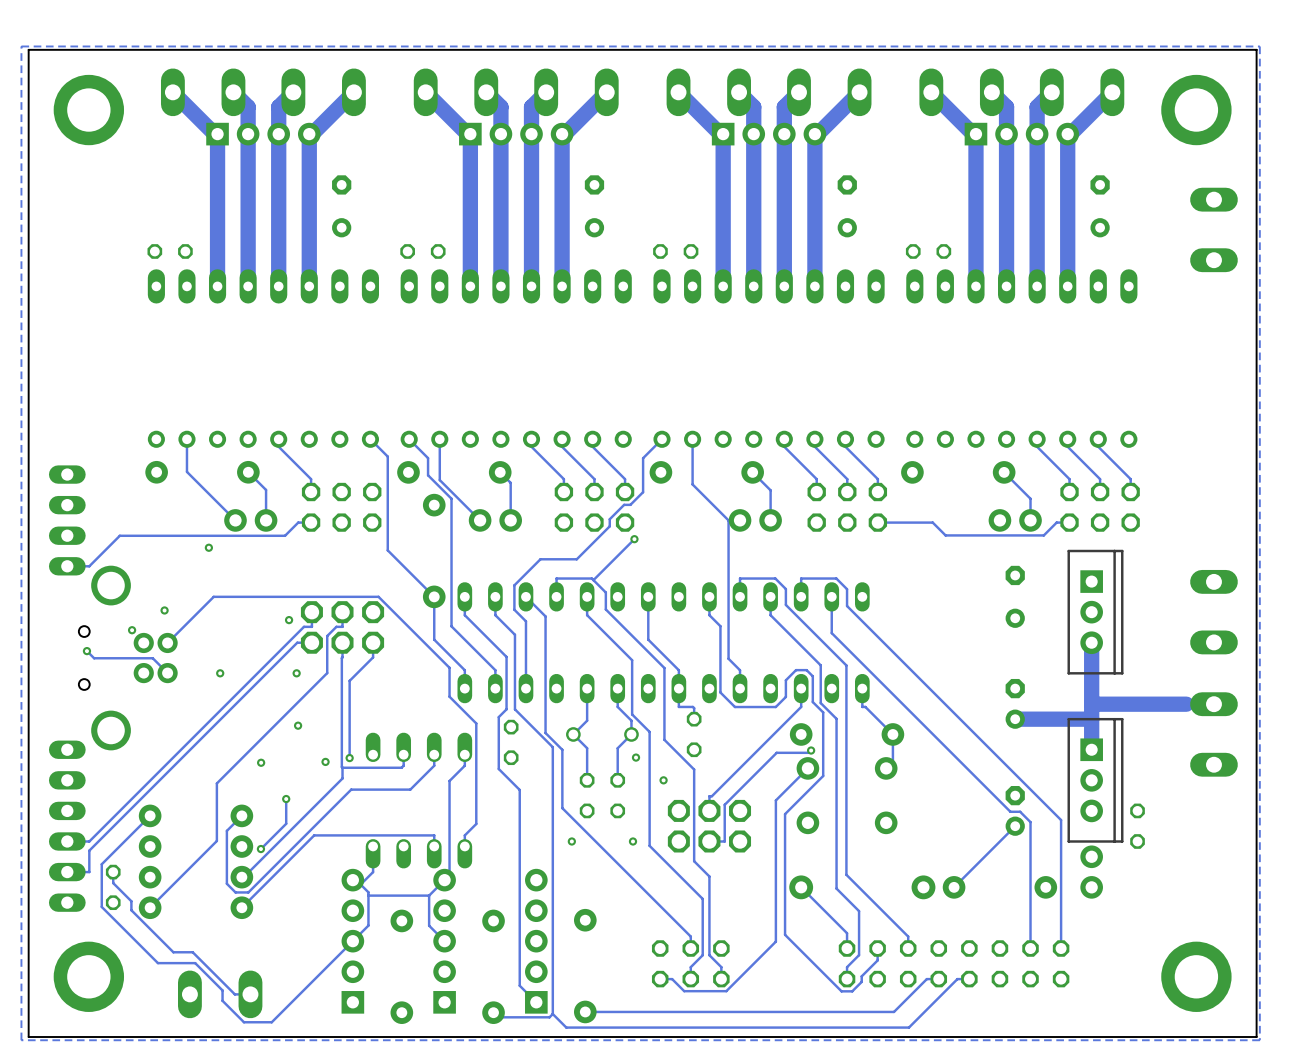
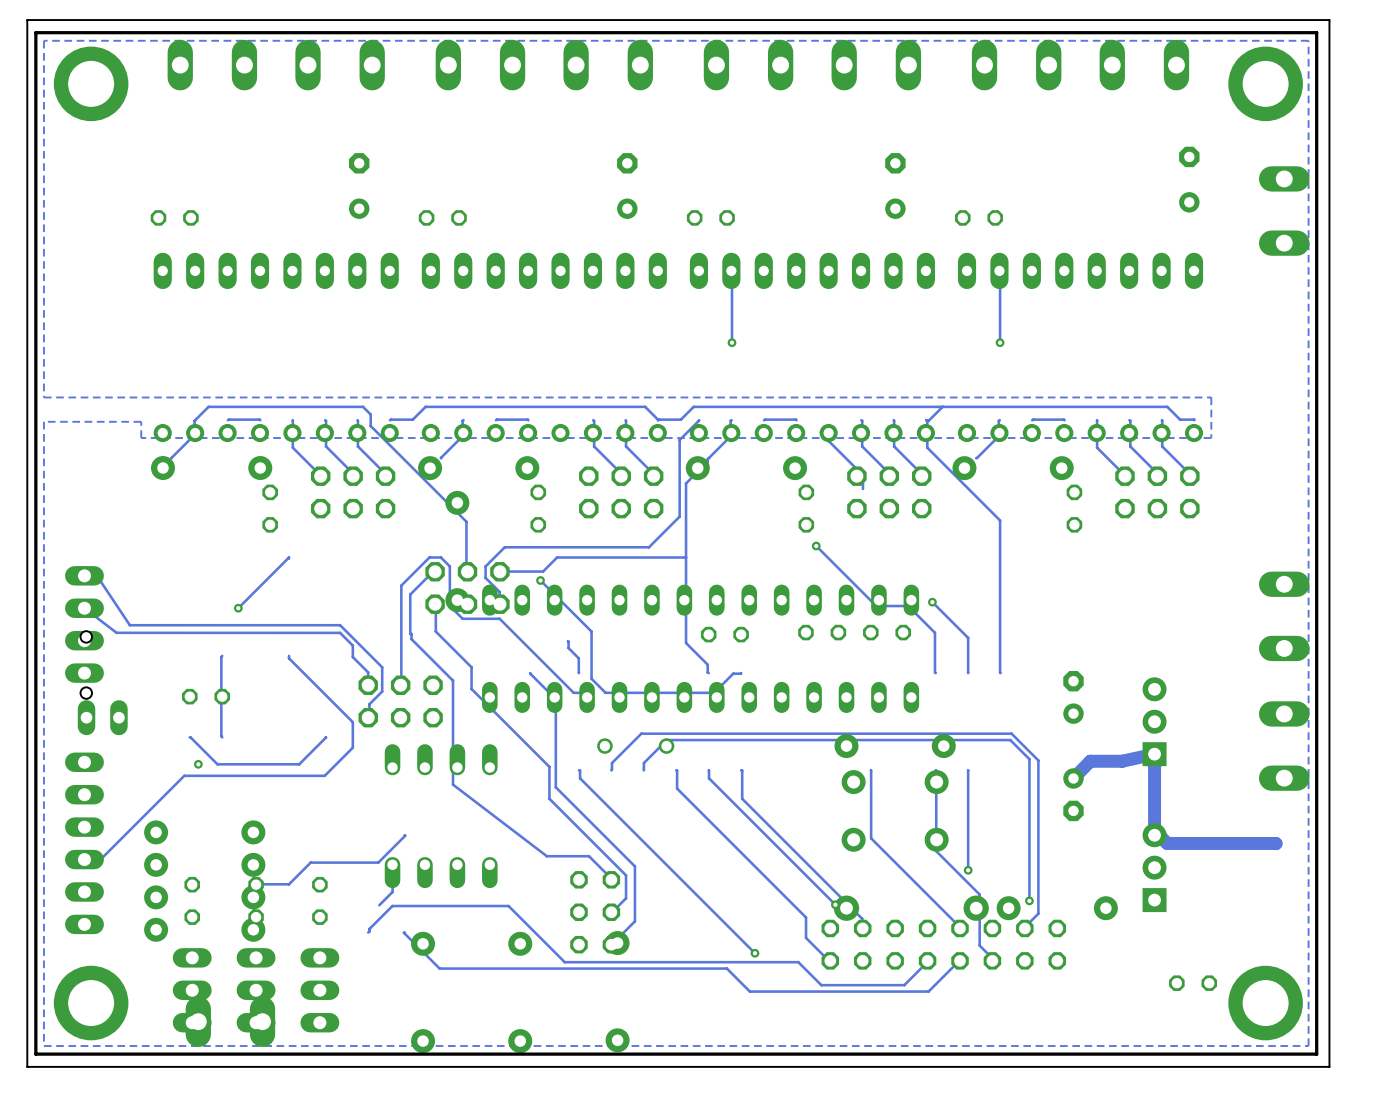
zone outline: (1259, 46) (21, 46) (21, 1040) (1259, 1040) (1259, 46) -> (1308, 40) (1308, 1046) (43, 1046) (43, 421) (141, 421) (141, 438) (1211, 438) (1211, 397) (43, 397) (43, 40) (1308, 40)
board edge: none -> (1316, 32) (1316, 1054) (35, 1054) (35, 32) (1316, 32)
track: (172, 92) (217, 136) -> none
track: (233, 92) (248, 107) (248, 286) -> none
track: (293, 92) (278, 107) (278, 286) -> none
track: (353, 92) (309, 136) -> none
track: (425, 92) (467, 134) (470, 134) (470, 286) -> none
track: (486, 92) (500, 107) (500, 286) -> none
track: (546, 92) (531, 107) (531, 286) -> none
track: (606, 92) (564, 134) (562, 134) (562, 286) -> none
track: (678, 92) (720, 134) (723, 134) (723, 286) -> none
track: (739, 92) (753, 107) (753, 286) -> none
track: (799, 92) (784, 107) (784, 286) -> none
track: (859, 92) (817, 134) (814, 134) (814, 286) -> none
track: (931, 92) (973, 134) (975, 134) (975, 286) -> none
track: (991, 92) (1006, 107) (1006, 286) -> none
track: (1051, 92) (1037, 107) (1037, 286) -> none
track: (1112, 92) (1070, 134) (1067, 134) (1067, 286) -> none
part: (263, 134) -> none
part: (516, 134) -> none
part: (769, 134) -> none
part: (1021, 134) -> none
track: (217, 136) (217, 286) -> none
track: (309, 136) (309, 286) -> none
part position: (1100, 206) -> (1189, 179)
part position: (170, 251) -> (174, 217)
part position: (422, 251) -> (442, 217)
part position: (675, 251) -> (710, 217)
part position: (928, 251) -> (978, 217)
track: none -> (731, 258) (731, 342)
track: none -> (999, 258) (1000, 342)
via: none -> (731, 342)
via: none -> (1000, 342)
track: none -> (942, 406) (928, 420) (926, 420) (927, 447) (1000, 520) (1000, 673)
track: none -> (260, 420) (227, 420)
track: none -> (292, 420) (292, 447) (320, 476)
track: none -> (325, 420) (326, 446) (352, 473) (353, 476)
track: none -> (357, 420) (357, 446) (385, 476)
track: none -> (463, 420) (462, 436) (441, 458)
track: none -> (528, 420) (495, 420)
track: none -> (593, 420) (594, 446) (620, 473) (621, 476)
track: none -> (625, 420) (626, 446) (653, 476)
track: none -> (699, 420) (679, 440) (679, 516) (649, 547) (504, 547) (485, 566) (485, 577) (499, 591) (499, 604)
track: none -> (731, 420) (730, 436) (686, 483) (686, 643) (707, 664) (708, 673)
track: none -> (796, 420) (764, 420)
track: none -> (861, 420) (862, 446) (889, 473) (889, 476)
track: none -> (893, 420) (894, 446) (921, 476)
track: none -> (999, 420) (998, 436) (976, 458)
track: none -> (1064, 420) (1032, 420)
track: none -> (1097, 420) (1097, 447) (1124, 476)
track: none -> (1129, 420) (1130, 446) (1157, 473) (1157, 476)
track: none -> (1161, 420) (1162, 446) (1189, 476)
track: none -> (1194, 420) (1180, 419) (1167, 406) (693, 406) (680, 419) (658, 420) (645, 406) (425, 406) (412, 419) (390, 420)
track: (186, 439) (186, 471) (235, 520) -> none
track: (278, 439) (278, 446) (311, 479) (311, 492) -> none
track: (370, 439) (387, 456) (387, 550) (434, 596) (434, 639) (464, 670) (464, 688) -> none
track: (409, 439) (428, 458) (428, 475) (451, 498) (451, 626) (495, 670) (495, 688) -> none
track: (439, 439) (439, 480) (480, 520) -> none
track: (531, 439) (531, 446) (563, 479) (563, 492) -> none
track: (562, 439) (562, 446) (594, 479) (594, 492) -> none
track: (592, 439) (592, 446) (625, 479) (625, 492) -> none
track: (662, 439) (643, 458) (643, 492) (630, 504) (624, 504) (609, 519) (609, 526) (576, 559) (540, 559) (514, 585) (514, 609) (525, 621) (525, 688) -> none
track: (692, 439) (692, 484) (728, 520) -> none
track: (814, 439) (814, 446) (847, 479) (847, 492) -> none
track: (845, 439) (845, 446) (877, 479) (877, 492) -> none
track: (1037, 439) (1037, 446) (1069, 479) (1069, 492) -> none
track: (1067, 439) (1067, 446) (1100, 479) (1100, 492) -> none
track: (1098, 439) (1098, 446) (1130, 479) (1130, 492) -> none
track: none -> (171, 458) (194, 434) (194, 420) (208, 406) (363, 406) (370, 414) (370, 426) (466, 521) (467, 571)
track: (248, 472) (266, 489) (266, 520) -> none
track: (500, 472) (510, 482) (510, 520) -> none
track: (752, 472) (770, 490) (770, 520) -> none
track: (1004, 472) (1030, 498) (1030, 520) -> none
part position: (341, 507) -> (353, 492)
part position: (594, 507) -> (621, 492)
part position: (847, 507) -> (889, 492)
part position: (1100, 507) -> (1157, 492)
part footprint: [988, 509, 1042, 532] -> [1066, 484, 1083, 533]
part: none -> (270, 508)
part: none -> (538, 508)
part: none -> (806, 508)
part position: (67, 520) -> (84, 624)
part: (250, 520) -> none
part: (495, 520) -> none
track: (728, 520) (728, 658) (740, 670) (740, 688) -> none
part: (755, 520) -> none
track: (311, 522) (298, 522) (285, 535) (119, 535) (89, 566) (67, 566) -> none
track: (1069, 522) (1056, 522) (1043, 535) (945, 535) (932, 522) (877, 522) -> none
track: (634, 539) (593, 580) -> none
via: (634, 539) -> none
track: none -> (816, 546) (876, 606) (908, 606) (934, 632) (935, 673)
via: none -> (816, 546)
via: (208, 547) -> none
track: none -> (686, 557) (557, 557) (543, 571) (499, 571)
track: none -> (289, 558) (238, 608)
track: none -> (435, 571) (410, 594) (410, 633) (411, 639) (453, 680) (453, 784) (546, 856) (589, 856) (611, 879)
track: none -> (84, 575) (97, 576) (129, 625) (340, 625) (382, 667) (382, 691) (369, 704) (368, 717)
track: none -> (540, 580) (591, 631) (591, 678) (605, 692) (714, 692) (733, 673) (741, 673)
via: none -> (540, 580)
part: none -> (467, 587)
track: (464, 596) (464, 615) (506, 656) (506, 709) (498, 717) (498, 769) (519, 789) (519, 985) (536, 1002) -> none
track: (495, 596) (495, 615) (514, 634) (514, 709) (552, 747) (552, 1014) -> none
track: (525, 596) (545, 616) (545, 733) (562, 749) (562, 808) (690, 936) (690, 948) -> none
track: (556, 596) (556, 578) (591, 578) (605, 592) (605, 609) (664, 668) (664, 739) (694, 769) (694, 861) (709, 876) (709, 955) (721, 967) (721, 979) -> none
track: (587, 596) (587, 615) (632, 660) (632, 714) (649, 731) (649, 845) (702, 898) (702, 955) (690, 967) (690, 979) -> none
track: (648, 596) (648, 639) (678, 670) (678, 706) (692, 706) (694, 719) -> none
track: (709, 596) (709, 615) (720, 626) (720, 692) (734, 707) (775, 707) (785, 696) (785, 680) (796, 670) (806, 670) (812, 676) (812, 702) (823, 712) (823, 775) (785, 814) (785, 934) (841, 991) (852, 991) (861, 981) (861, 976) (877, 960) (877, 948) -> none
track: (740, 596) (740, 578) (775, 578) (785, 589) (785, 604) (846, 665) (846, 874) (908, 936) (908, 948) -> none
track: (770, 596) (770, 615) (820, 665) (820, 703) (836, 718) (836, 888) (859, 911) (859, 955) (847, 967) (847, 979) -> none
track: (801, 596) (801, 578) (836, 578) (847, 589) (847, 606) (1061, 820) (1061, 948) -> none
track: (831, 596) (831, 633) (1010, 811) (1020, 811) (1030, 822) (1030, 948) -> none
part: (1015, 596) -> none
track: none -> (932, 602) (968, 637) (968, 673)
via: none -> (932, 602)
track: none -> (435, 604) (435, 631) (471, 667) (471, 689) (549, 766) (549, 798) (626, 875) (626, 898) (611, 912)
track: none -> (84, 608) (116, 632) (340, 632) (352, 645) (352, 657) (368, 672) (368, 685)
via: none -> (238, 608)
via: (164, 610) -> none
track: (311, 612) (311, 626) (303, 626) (89, 841) (67, 841) -> none
track: (342, 612) (342, 626) (336, 626) (327, 636) (327, 673) (216, 783) (216, 840) (150, 907) -> none
part: (1095, 612) -> none
via: (289, 620) -> none
part: (342, 627) -> none
part: none -> (822, 632)
part: none -> (887, 632)
part: none -> (724, 634)
via: (132, 630) -> none
track: none -> (567, 641) (568, 648) (578, 658) (578, 673)
track: (167, 642) (213, 596) (378, 596) (449, 667) (449, 696) (476, 723) (476, 823) (464, 835) (464, 846) -> none
track: (311, 642) (297, 642) (89, 850) (89, 872) (67, 872) -> none
track: (342, 642) (342, 767) -> none
track: (373, 642) (373, 657) (349, 680) (349, 758) -> none
track: (1091, 642) (1091, 742) -> (1073, 778) (1090, 761) (1122, 761) (1154, 754)
track: none -> (222, 655) (222, 737)
track: none -> (289, 655) (289, 658) (352, 722) (352, 747) (324, 775) (184, 775) (101, 858) (84, 859)
track: (86, 651) (94, 658) (152, 658) (167, 673) -> none
via: (86, 651) -> none
part: (134, 658) -> none
track: none -> (530, 673) (555, 699) (555, 787) (634, 866) (634, 921) (611, 944)
via: (220, 673) -> none
via: (296, 673) -> none
track: none -> (400, 685) (401, 585) (429, 557) (440, 557) (449, 566) (449, 606) (462, 618) (499, 618) (573, 692) (591, 692)
part: none -> (206, 696)
track: (587, 688) (587, 720) (573, 734) (587, 748) (587, 780) -> none
track: (617, 688) (617, 706) (631, 720) (631, 734) (617, 748) (617, 780) -> none
track: (801, 688) (801, 706) (711, 796) (709, 796) (709, 810) -> none
track: (862, 688) (862, 706) (865, 706) (892, 734) (892, 761) (886, 768) -> none
part: none -> (400, 701)
part position: (1015, 703) -> (1073, 697)
track: (1213, 704) (1091, 704) -> none
part: none -> (102, 717)
track: (1091, 719) (1015, 719) -> none
via: (298, 725) -> none
track: none -> (325, 737) (299, 764) (217, 764) (189, 737)
part: (694, 734) -> none
part: (511, 742) -> none
track: none -> (1154, 762) (1154, 835) (1160, 837) (1167, 843) (1276, 843)
track: (811, 750) (808, 752) (776, 752) (724, 804) (724, 841) (709, 841) -> none
via: (811, 750) -> none
via: none -> (198, 764)
track: (403, 754) (403, 765) (401, 767) (342, 767) -> none
track: (434, 754) (434, 765) (410, 789) (351, 789) (248, 892) (235, 892) (226, 883) (226, 830) (241, 815) -> none
track: (464, 754) (464, 765) (449, 780) (449, 875) (429, 895) -> none
track: none -> (578, 770) (580, 778) (754, 953)
track: none -> (611, 770) (611, 763) (641, 733) (1011, 733) (1038, 760) (1038, 913) (1024, 928)
track: none -> (643, 770) (643, 763) (666, 740) (1010, 740) (1029, 759) (1029, 900)
via: (636, 757) -> none
track: none -> (676, 770) (677, 788) (806, 917) (806, 937) (830, 960)
track: none -> (708, 770) (709, 778) (835, 904)
track: none -> (741, 770) (742, 798) (862, 918) (862, 928)
track: none -> (870, 770) (871, 838) (959, 928)
track: none -> (935, 770) (936, 851) (979, 894) (979, 945) (992, 958) (992, 960)
track: none -> (968, 770) (968, 870)
via: (349, 758) -> none
via: (325, 761) -> none
via: (261, 762) -> none
track: (342, 767) (342, 778) (241, 877) -> none
track: (807, 768) (775, 800) (775, 941) (726, 991) (684, 991) (672, 979) (660, 979) -> none
via: (663, 780) -> none
part side: bottom (1095, 780) -> top (1154, 721)
part: (587, 795) -> none
part: (617, 795) -> none
track: (286, 799) (286, 823) (260, 849) -> none
via: (286, 799) -> none
part rotation: 0° (1015, 810) -> 180° (1073, 794)
part position: (1015, 810) -> (1073, 794)
track: (150, 815) (101, 864) (101, 906) (157, 963) (195, 963) (222, 990) (222, 1000) (243, 1022) (271, 1022) (368, 925) (368, 892) (352, 880) -> none
track: none -> (404, 835) (378, 862) (310, 862) (289, 884) (256, 884)
part position: (67, 826) -> (84, 843)
part: (709, 826) -> none
track: (1015, 826) (954, 887) -> none
part rotation: 0° (1137, 826) -> 90° clockwise (1193, 983)
part position: (1137, 826) -> (1193, 983)
via: (571, 841) -> none
via: (633, 841) -> none
track: (434, 846) (434, 835) (314, 835) (241, 907) -> none
via: (260, 849) -> none
part: none -> (1154, 867)
via: none -> (968, 870)
track: (113, 872) (113, 883) (131, 901) (131, 910) (173, 952) (192, 952) (234, 994) (250, 994) -> none
part: (1091, 872) -> none
part: none -> (192, 900)
part: none -> (256, 900)
part: none -> (319, 900)
via: none -> (1029, 900)
via: none -> (835, 904)
part: (113, 887) -> none
track: (801, 887) (847, 933) (847, 948) -> none
part: (352, 895) -> none
track: (429, 895) (368, 895) -> none
track: (429, 895) (429, 925) (444, 941) -> none
part: (444, 895) -> none
part: (536, 895) -> none
track: none -> (368, 932) (392, 906) (508, 906) (564, 962) (798, 962) (821, 985) (904, 985) (927, 960)
track: none -> (404, 932) (439, 968) (726, 968) (749, 991) (928, 991) (959, 960)
via: none -> (754, 953)
part rotation: 0° (690, 963) -> 90° clockwise (595, 912)
part position: (690, 963) -> (595, 912)
part position: (954, 963) -> (943, 944)
part: none -> (192, 990)
part: none -> (256, 990)
part: none -> (319, 990)
part: (352, 971) -> none
part: (444, 971) -> none
part: (536, 971) -> none
track: (938, 979) (926, 979) (893, 1011) (585, 1011) -> none
track: (969, 979) (957, 979) (908, 1027) (566, 1027) (552, 1014) -> none
track: (493, 1012) (498, 1017) (549, 1017) (552, 1014) -> none

